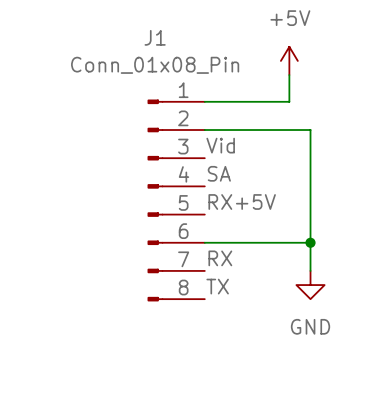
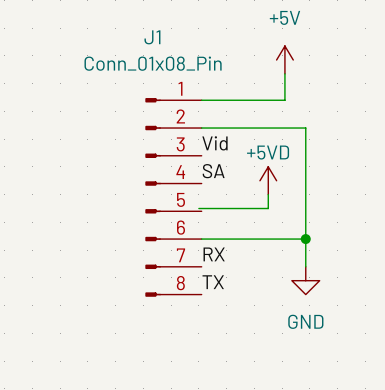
power symbol: none -> +5VD (268, 180)
wire: none -> (268, 194) (268, 208) (198, 208)
label: RX+5V (242, 201) -> none

